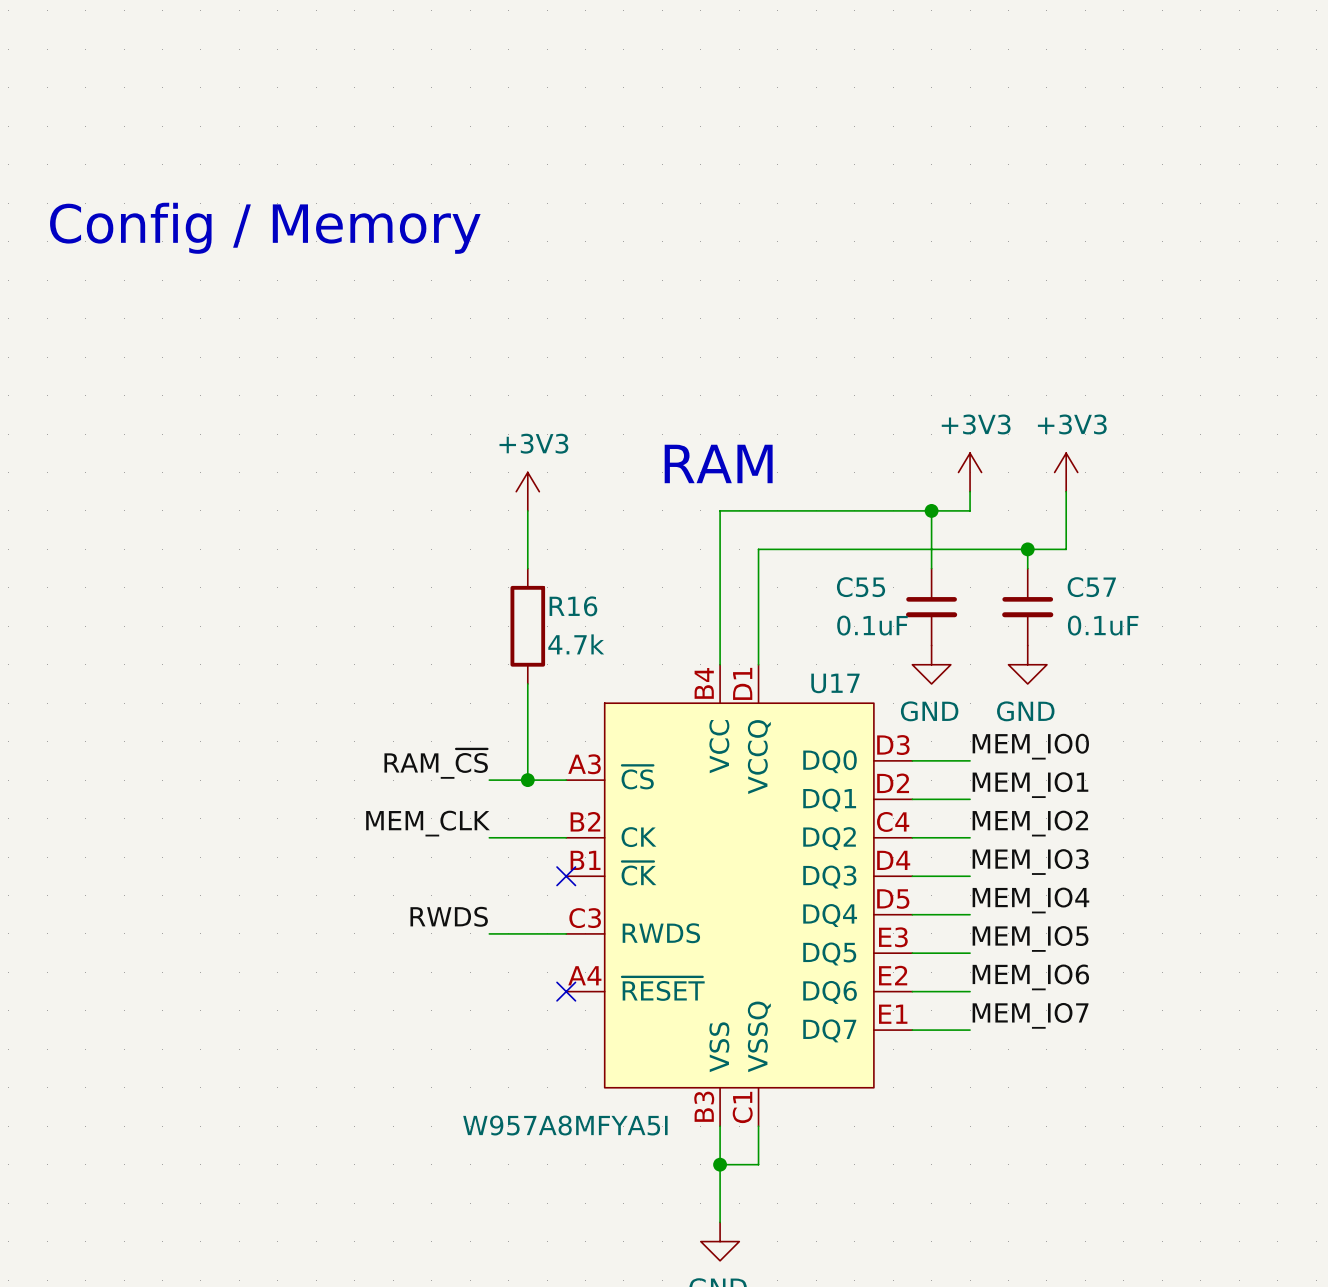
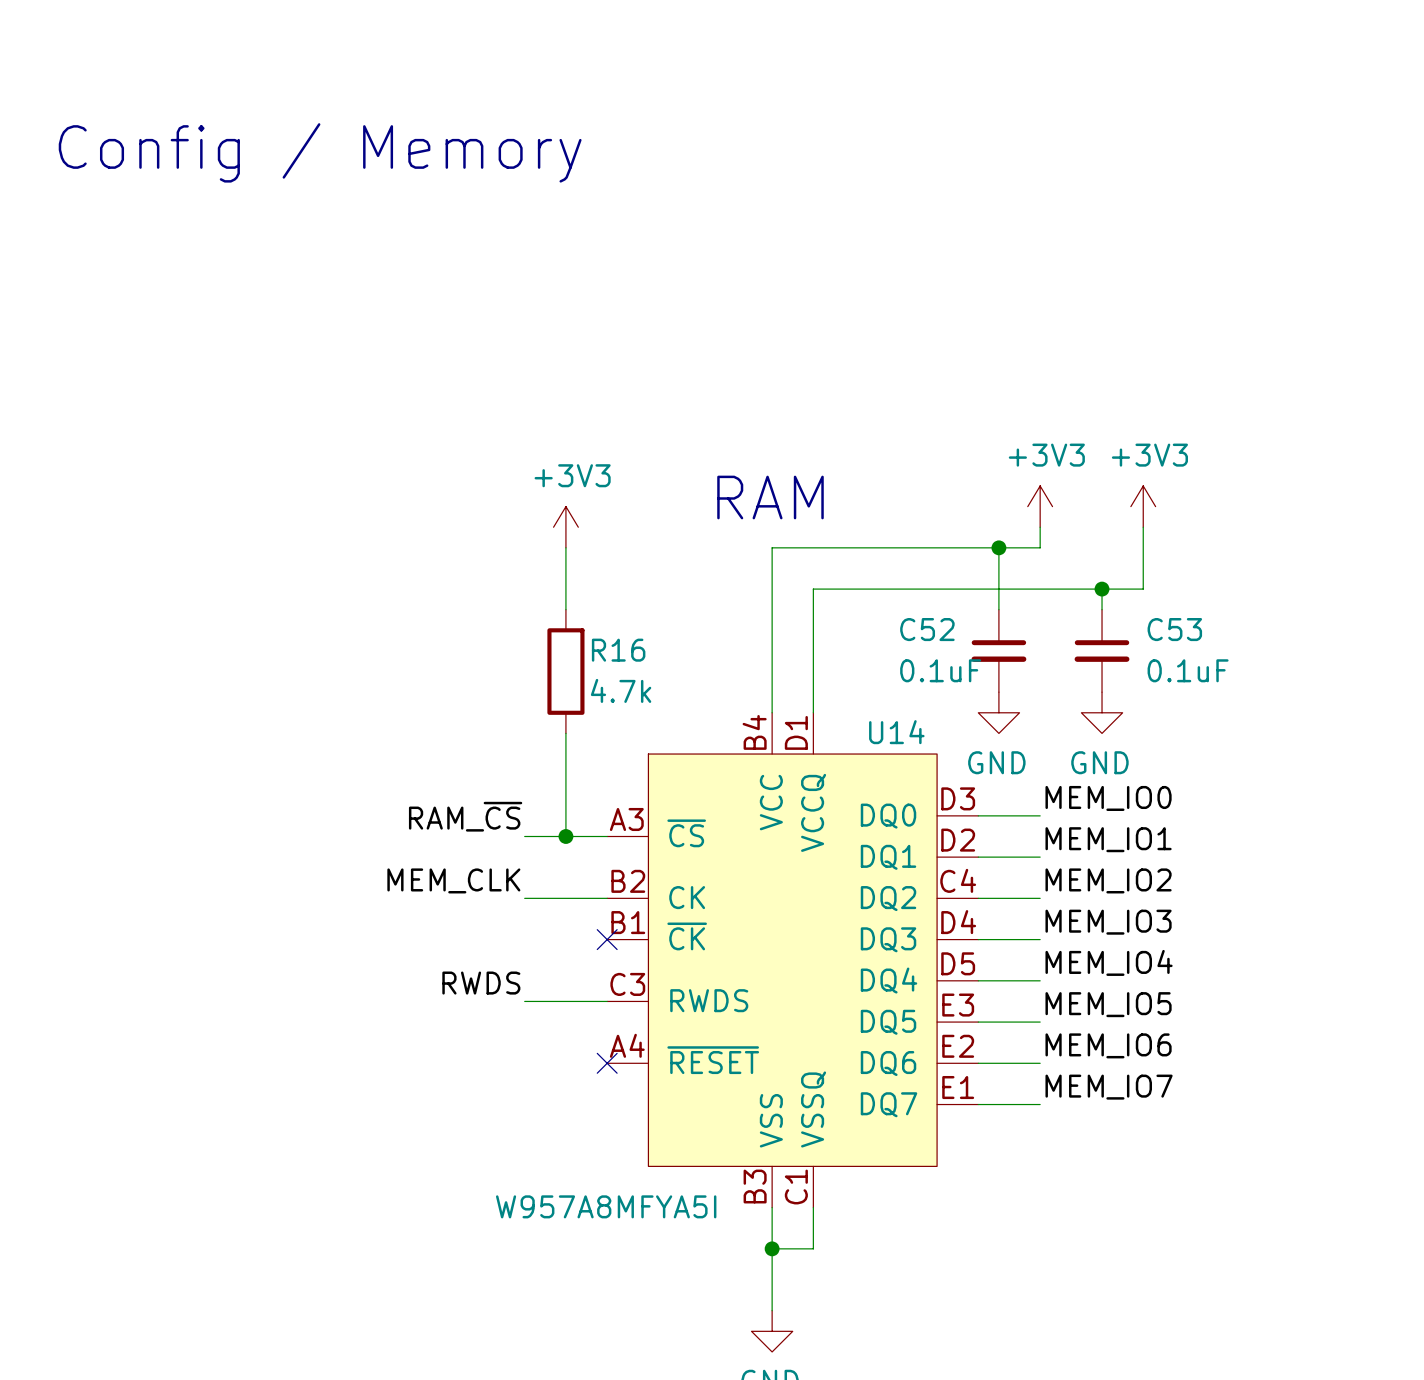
text position: Config / Memory (265, 228) -> Config / Memory (320, 152)
C55 name: C55 (861, 587) -> C52 (927, 629)
C57 name: C57 (1091, 587) -> C53 (1174, 629)
U17 name: U17 (835, 683) -> U14 (896, 732)

